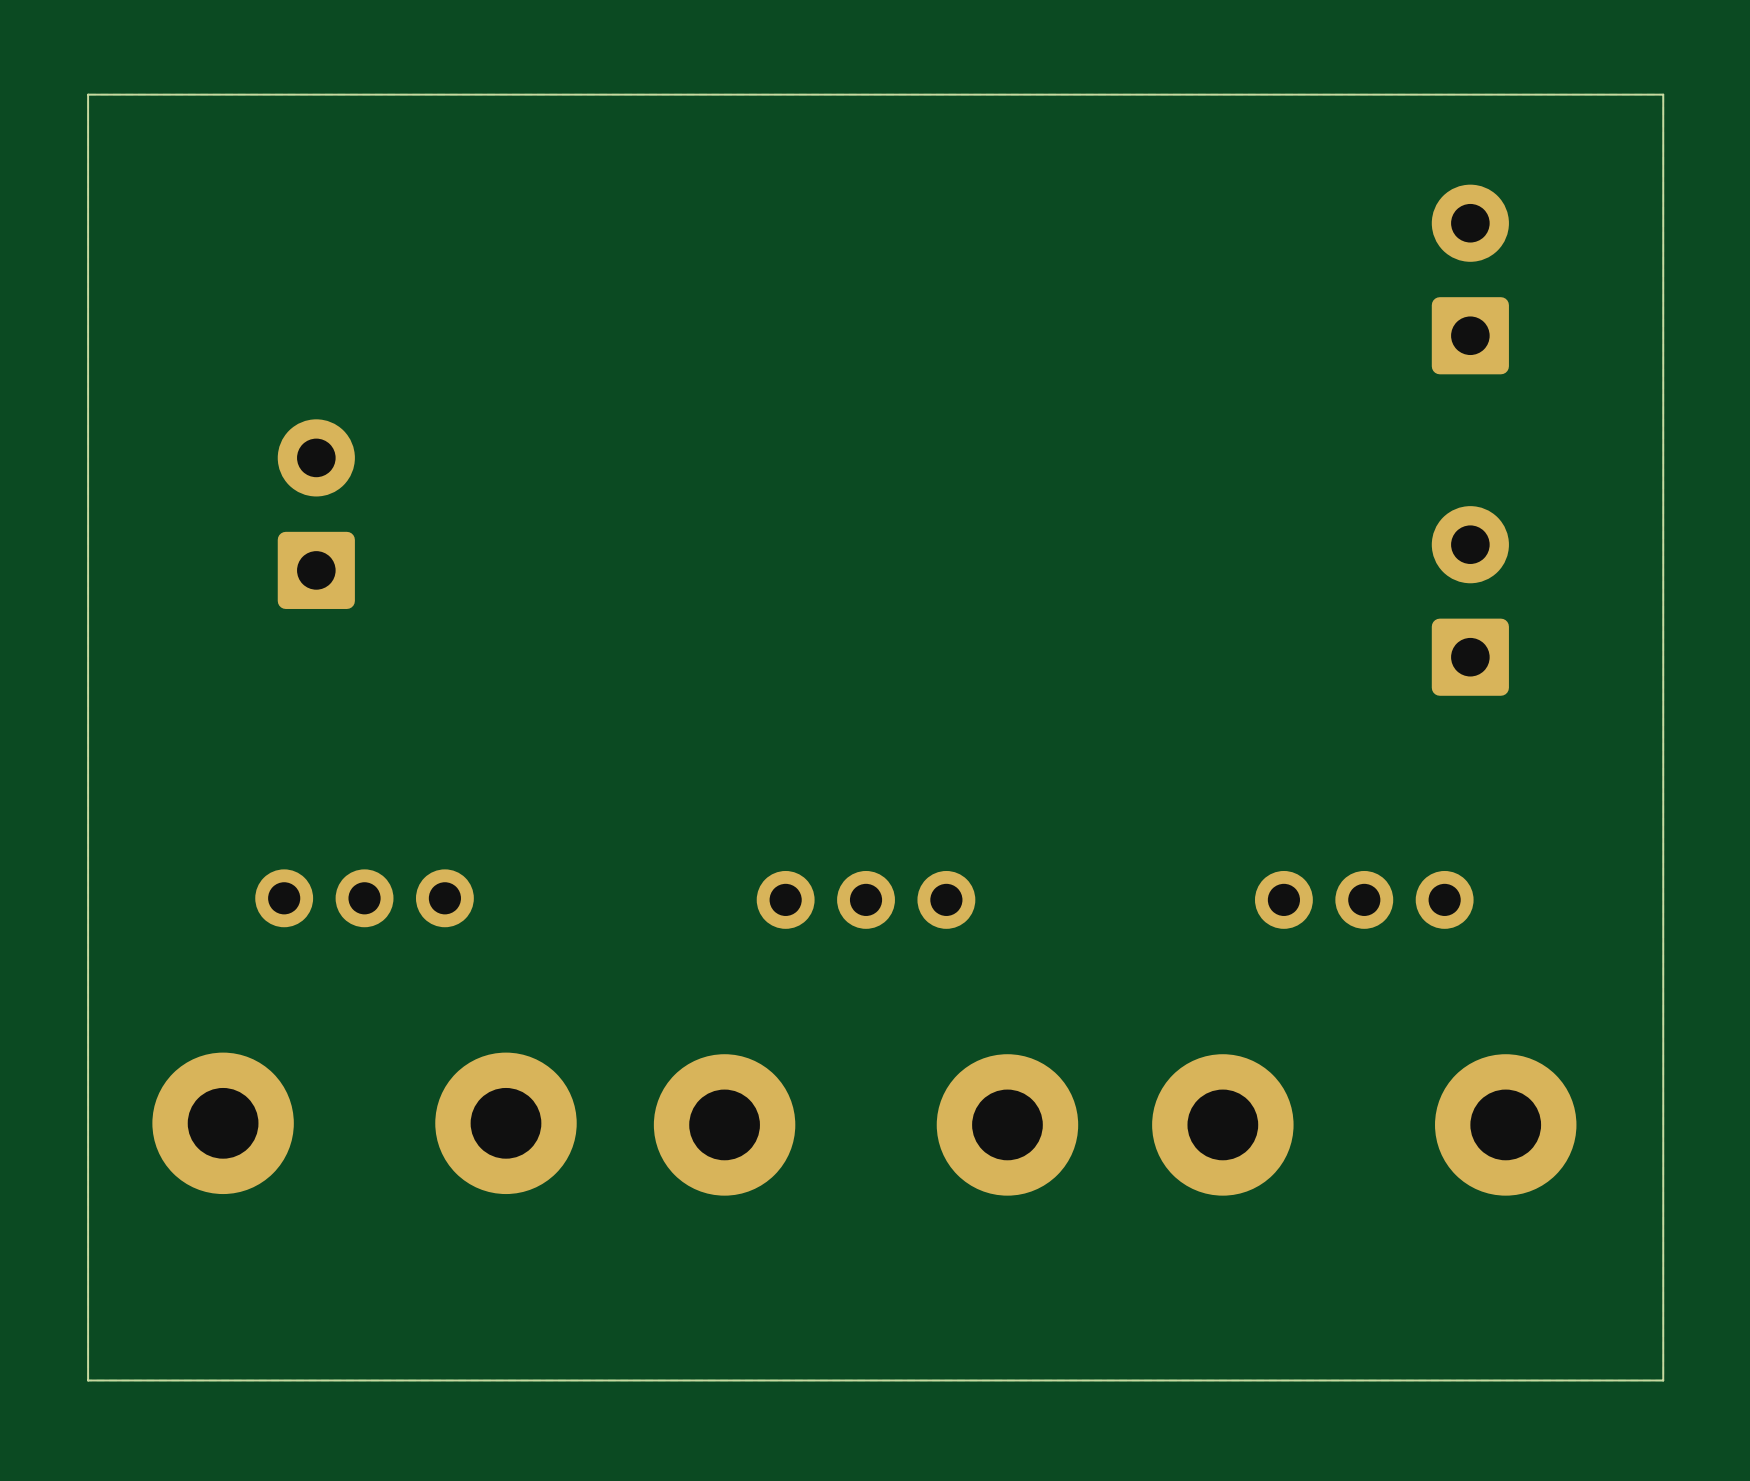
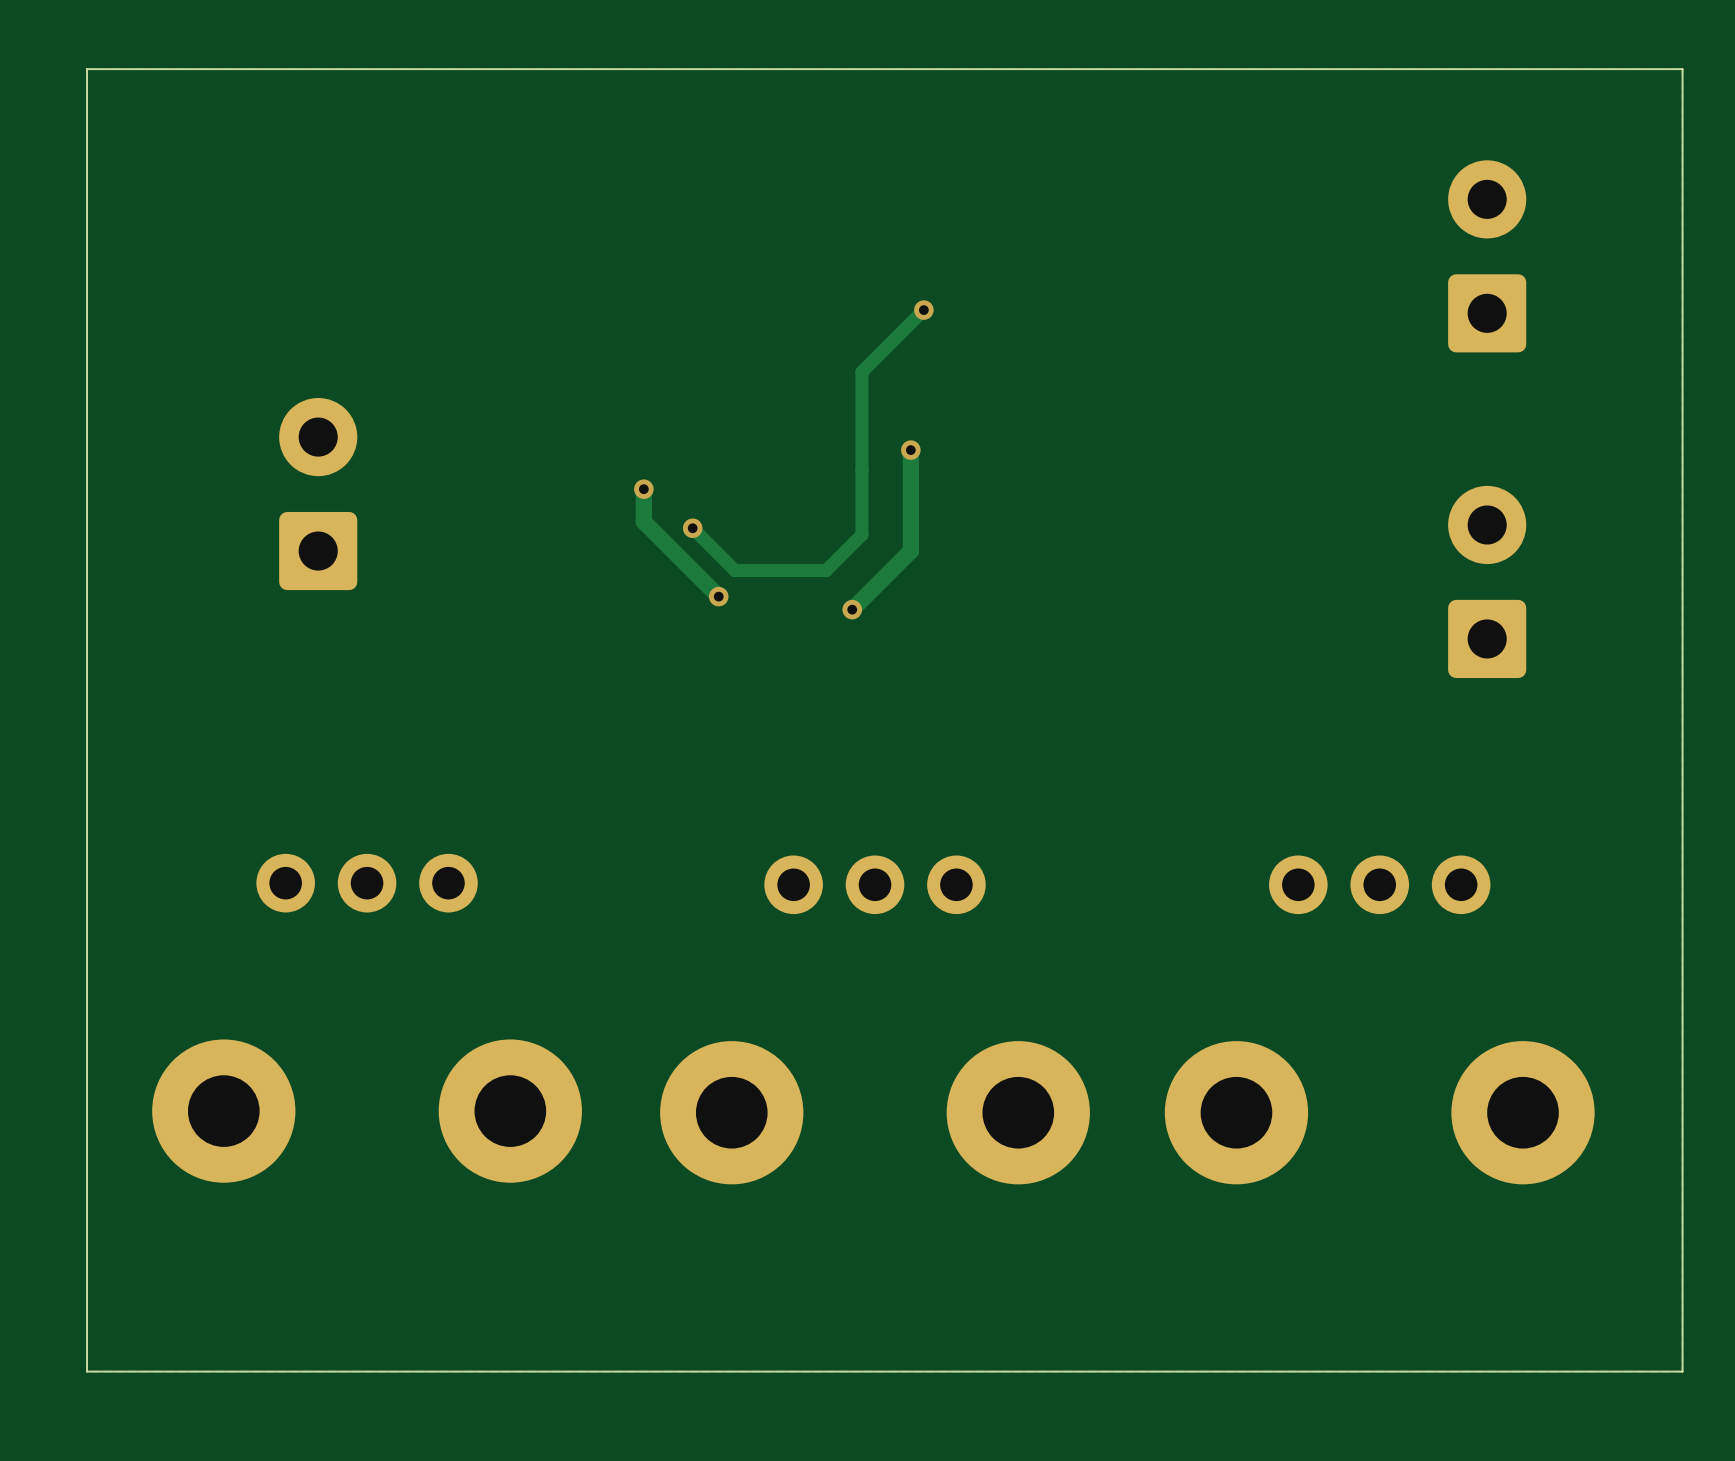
track: none -> (923, 310) (862, 371) (862, 534) (826, 570) (735, 570) (692, 528)
via: none -> (923, 310)
track: none -> (910, 450) (910, 551) (852, 609)
via: none -> (910, 450)
track: none -> (643, 489) (643, 521) (718, 596)
via: none -> (643, 489)
via: none -> (692, 528)
via: none -> (718, 596)
via: none -> (852, 609)

